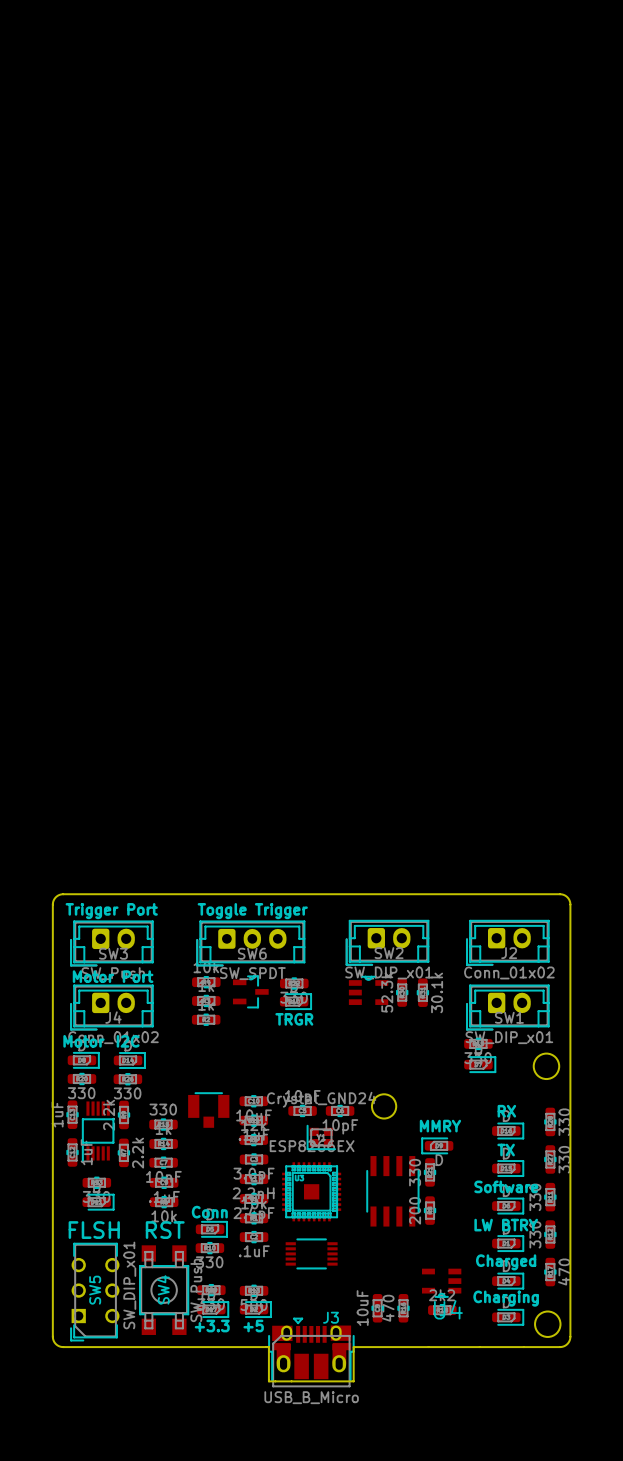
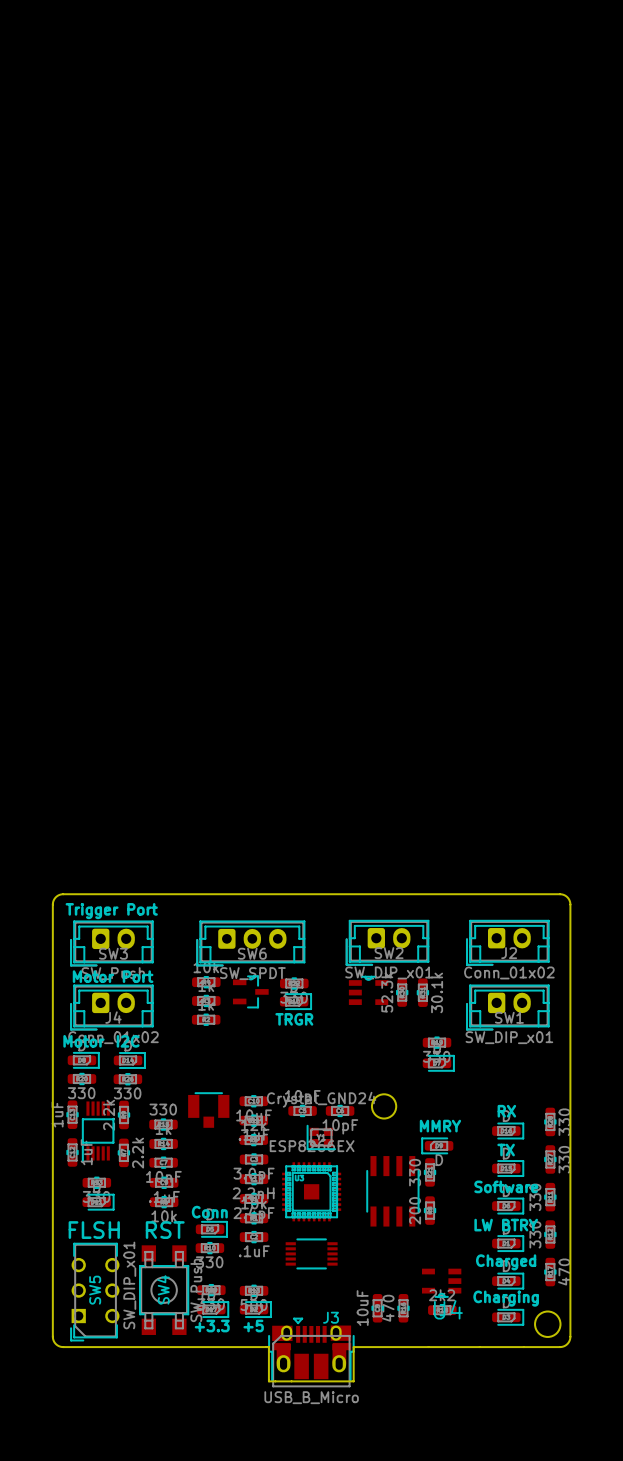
text: Toggle Trigger (252, 911) -> none
part position: (478, 1043) -> (437, 1042)
round board edge: [533, 1053, 560, 1080] -> none
part position: (480, 1064) -> (438, 1063)

